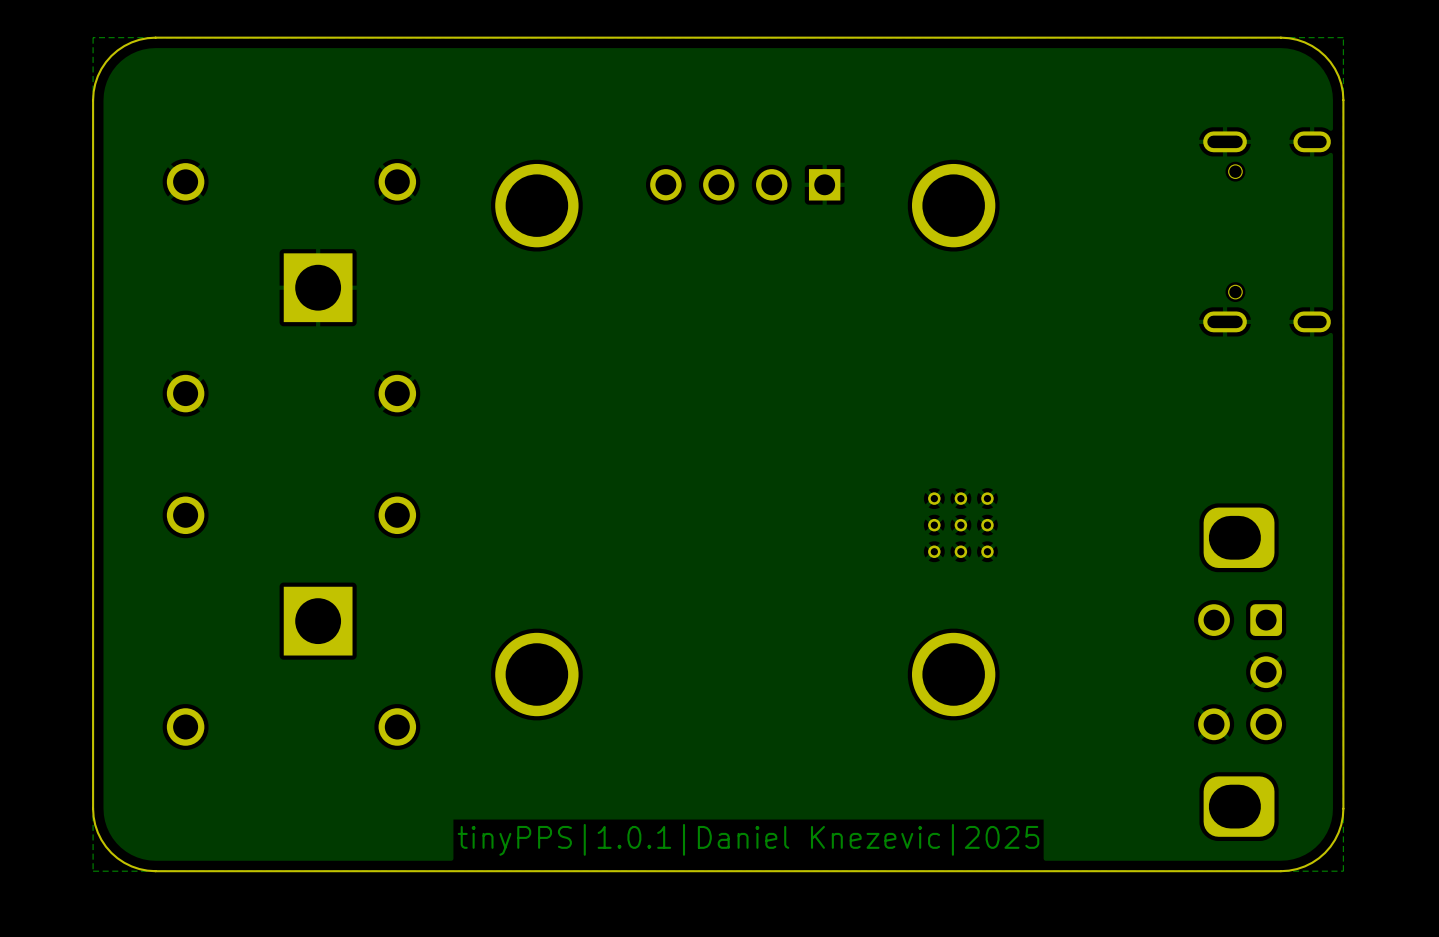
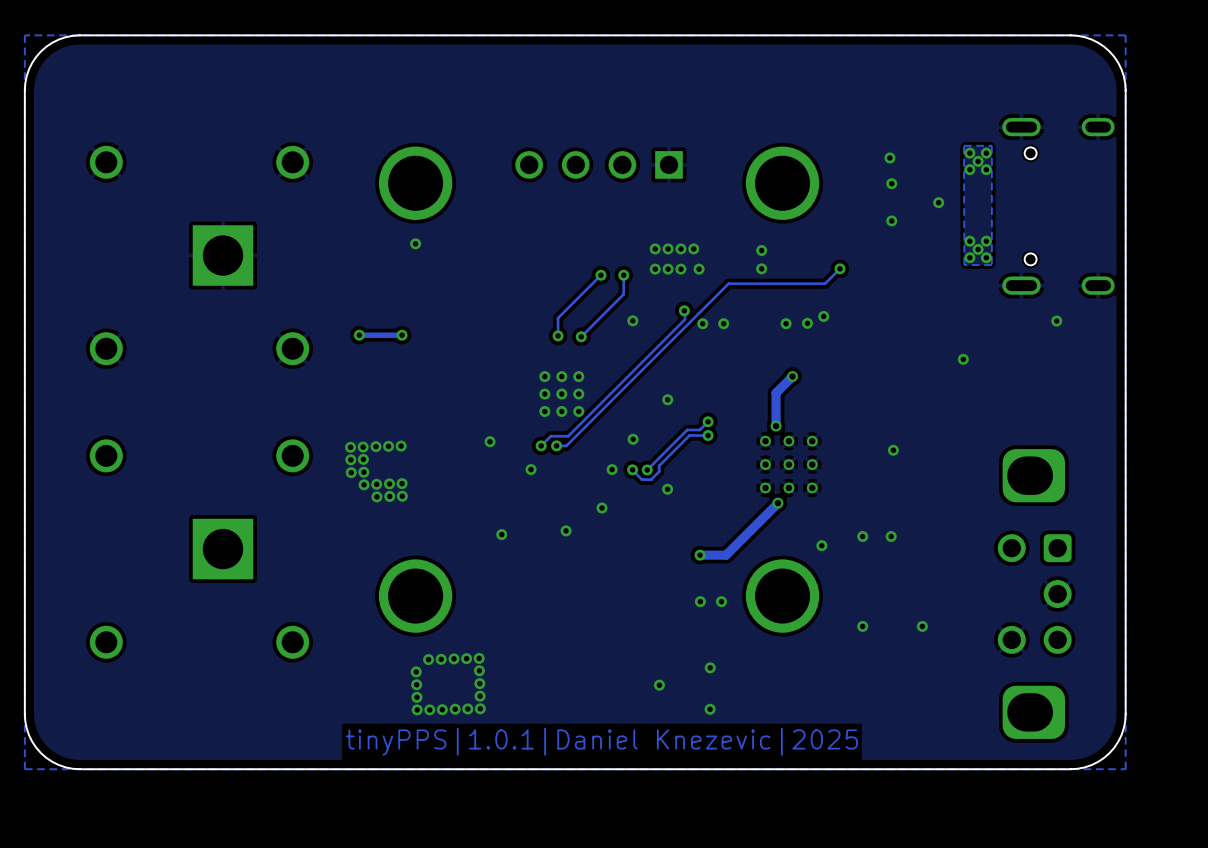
zone outline: none -> (991, 145) (963, 145) (964, 265) (991, 265) (991, 145)
via: none -> (969, 153)
via: none -> (986, 153)
via: none -> (889, 157)
via: none -> (978, 161)
via: none -> (969, 169)
via: none -> (986, 169)
via: none -> (891, 183)
via: none -> (938, 202)
via: none -> (891, 220)
via: none -> (969, 241)
via: none -> (986, 241)
via: none -> (415, 243)
via: none -> (655, 248)
via: none -> (668, 248)
via: none -> (680, 248)
via: none -> (693, 248)
via: none -> (978, 249)
via: none -> (761, 250)
via: none -> (969, 257)
via: none -> (986, 257)
via: none -> (761, 268)
track: none -> (840, 268) (825, 283) (728, 283) (566, 445) (556, 445)
via: none -> (840, 268)
via: none -> (655, 269)
via: none -> (668, 269)
via: none -> (680, 269)
via: none -> (699, 269)
via: none -> (600, 275)
track: none -> (623, 275) (623, 294) (581, 336)
via: none -> (623, 275)
track: none -> (603, 278) (600, 275) (558, 318) (558, 335)
track: none -> (684, 310) (685, 319) (568, 436) (550, 436) (541, 445)
via: none -> (684, 310)
via: none -> (823, 316)
via: none -> (632, 320)
via: none -> (1056, 321)
via: none -> (807, 323)
via: none -> (702, 323)
via: none -> (723, 323)
via: none -> (786, 323)
via: none -> (359, 335)
track: none -> (402, 335) (359, 335)
via: none -> (402, 335)
via: none -> (558, 335)
via: none -> (581, 336)
via: none -> (963, 359)
via: none -> (544, 376)
via: none -> (561, 376)
via: none -> (578, 376)
track: none -> (792, 376) (776, 393) (776, 426)
via: none -> (792, 376)
via: none -> (544, 394)
via: none -> (561, 394)
via: none -> (578, 394)
via: none -> (667, 399)
via: none -> (544, 411)
via: none -> (561, 411)
via: none -> (578, 411)
track: none -> (708, 421) (699, 429) (687, 429) (647, 469)
via: none -> (708, 421)
via: none -> (776, 426)
track: none -> (708, 435) (689, 435) (659, 465) (659, 471) (651, 479) (641, 479) (632, 469)
via: none -> (708, 435)
via: none -> (633, 439)
via: none -> (490, 441)
via: none -> (541, 445)
via: none -> (556, 445)
via: none -> (375, 446)
via: none -> (388, 446)
via: none -> (401, 446)
via: none -> (350, 447)
via: none -> (363, 447)
via: none -> (893, 450)
via: none -> (350, 459)
via: none -> (363, 459)
via: none -> (531, 469)
via: none -> (612, 469)
via: none -> (632, 469)
via: none -> (647, 469)
via: none -> (363, 472)
via: none -> (351, 472)
via: none -> (402, 483)
via: none -> (376, 484)
via: none -> (389, 483)
via: none -> (364, 484)
via: none -> (667, 489)
via: none -> (376, 496)
via: none -> (389, 496)
via: none -> (402, 496)
via: none -> (777, 503)
track: none -> (777, 503) (726, 555) (700, 555)
via: none -> (602, 508)
via: none -> (566, 530)
via: none -> (501, 534)
via: none -> (862, 536)
via: none -> (891, 536)
via: none -> (821, 545)
via: none -> (700, 555)
via: none -> (700, 601)
via: none -> (721, 601)
via: none -> (862, 626)
via: none -> (922, 626)
via: none -> (453, 658)
via: none -> (466, 658)
via: none -> (479, 658)
via: none -> (428, 659)
via: none -> (441, 659)
via: none -> (710, 667)
via: none -> (479, 670)
via: none -> (416, 671)
via: none -> (479, 683)
via: none -> (416, 684)
via: none -> (659, 685)
via: none -> (480, 696)
via: none -> (416, 697)
via: none -> (467, 708)
via: none -> (480, 708)
via: none -> (417, 709)
via: none -> (429, 709)
via: none -> (442, 709)
via: none -> (455, 709)
via: none -> (710, 709)

